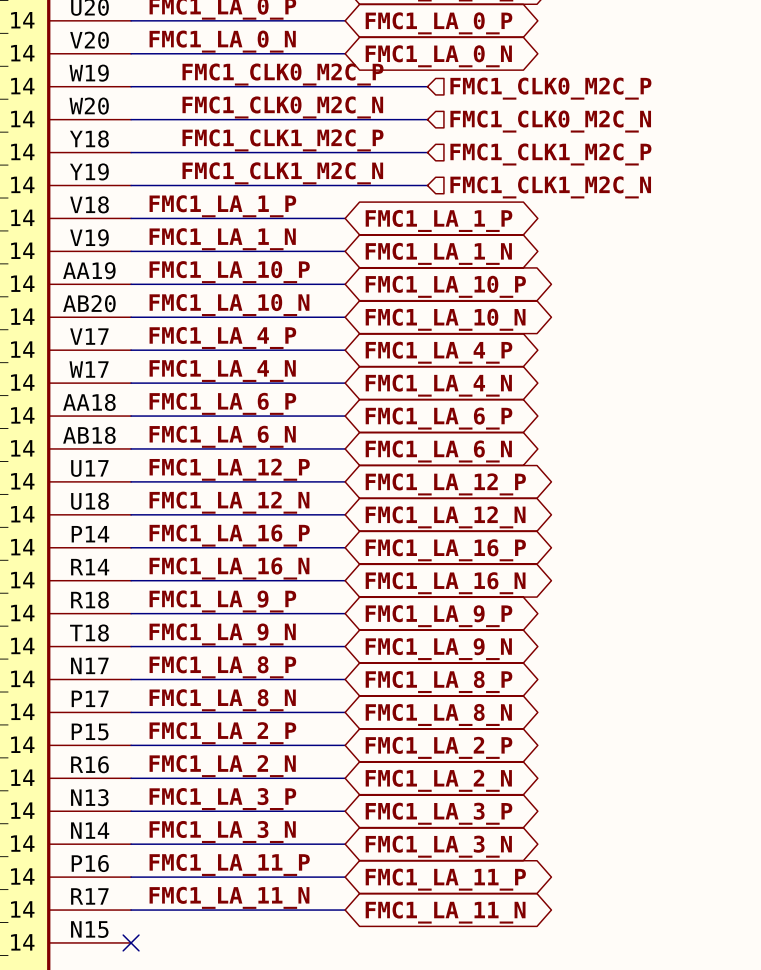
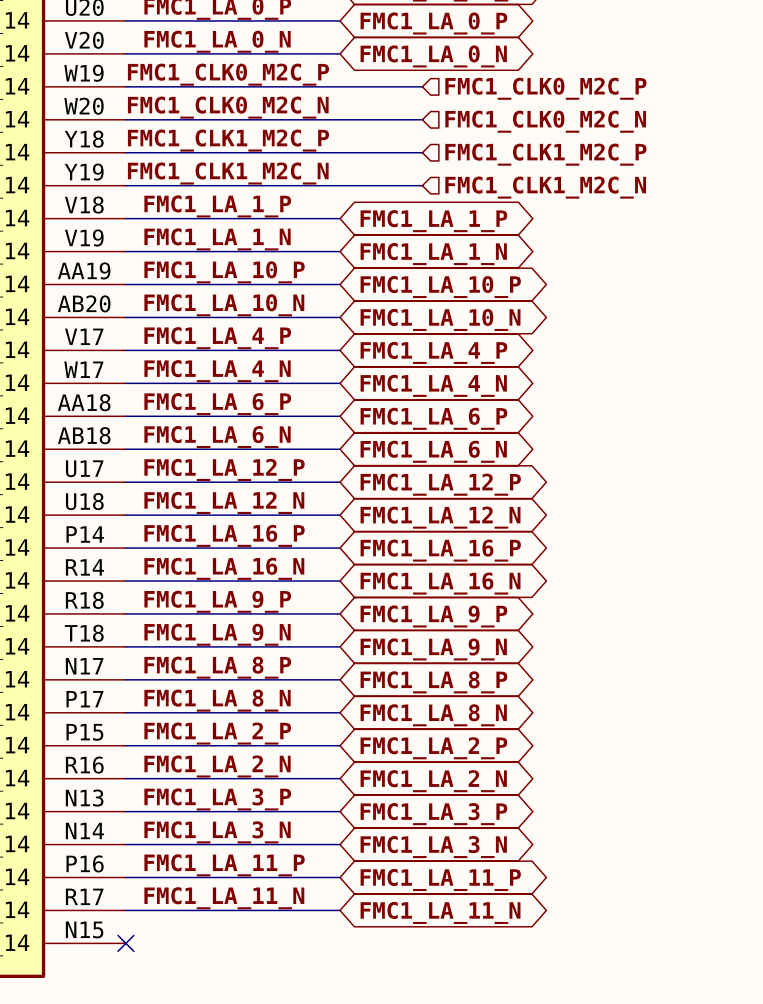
label position: FMC1_CLK0_M2C_P (282, 74) -> FMC1_CLK0_M2C_P (228, 74)
label position: FMC1_CLK0_M2C_N (282, 107) -> FMC1_CLK0_M2C_N (228, 107)
label position: FMC1_CLK1_M2C_P (282, 140) -> FMC1_CLK1_M2C_P (228, 140)
label position: FMC1_CLK1_M2C_N (282, 173) -> FMC1_CLK1_M2C_N (228, 173)

